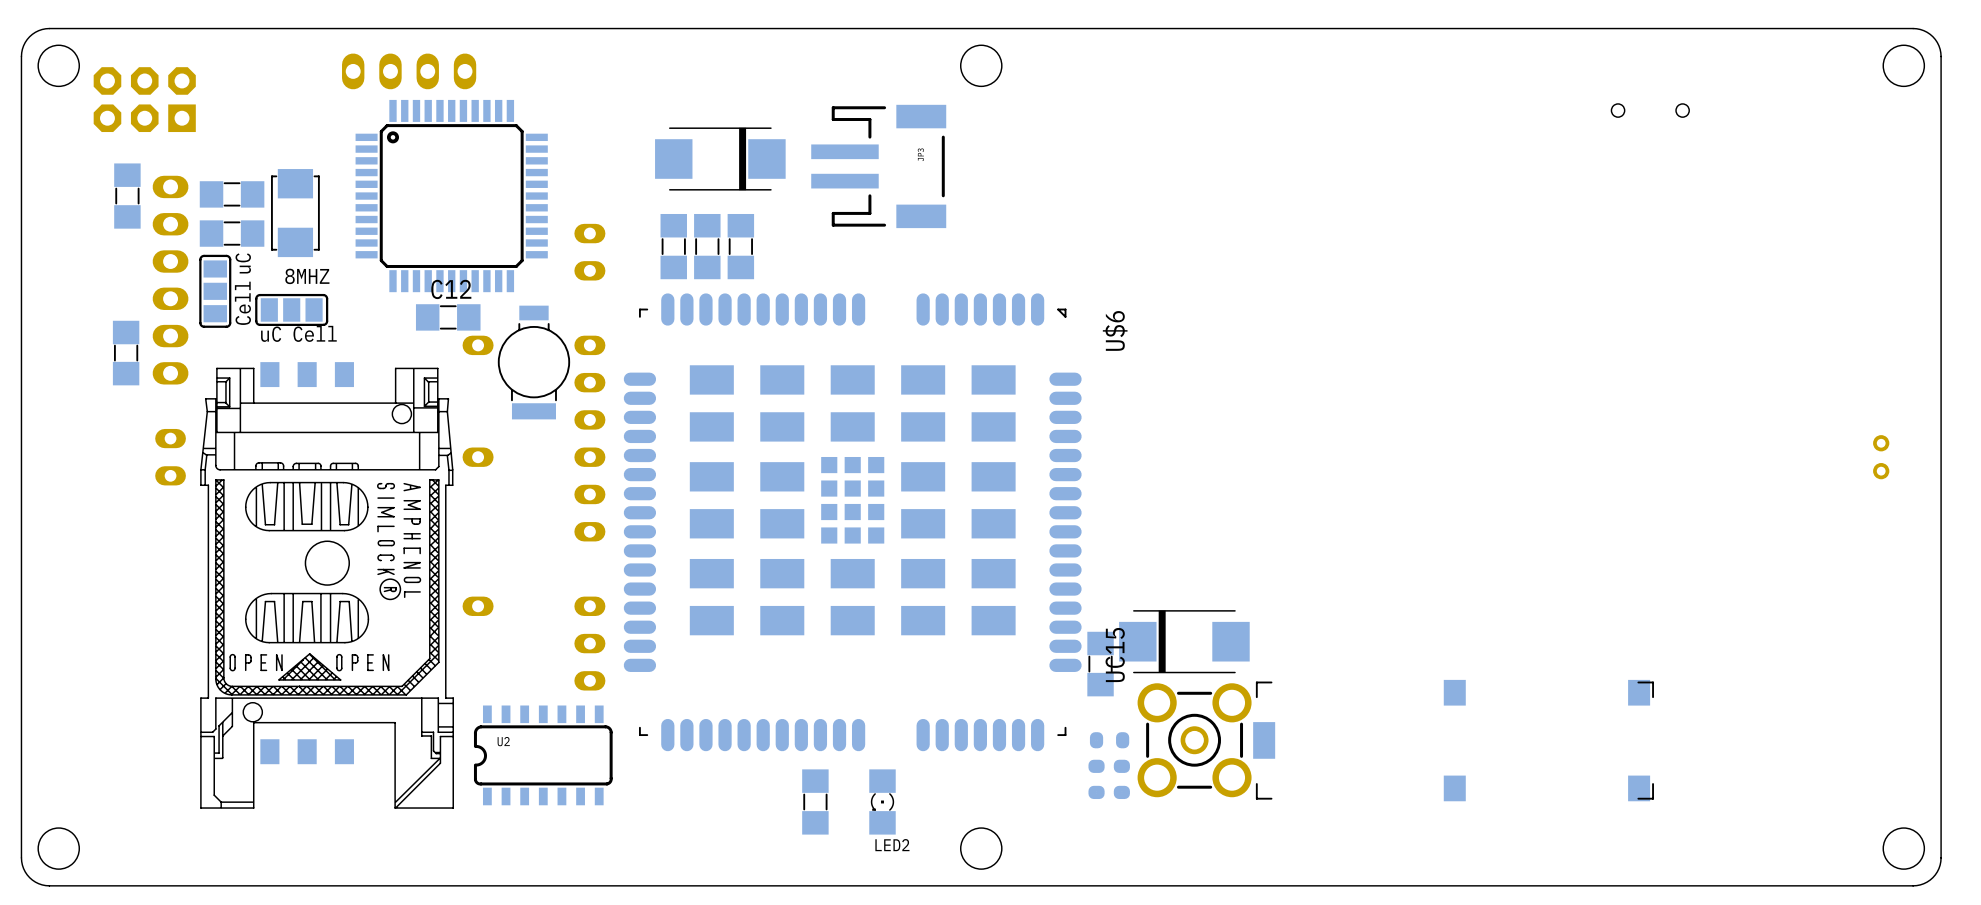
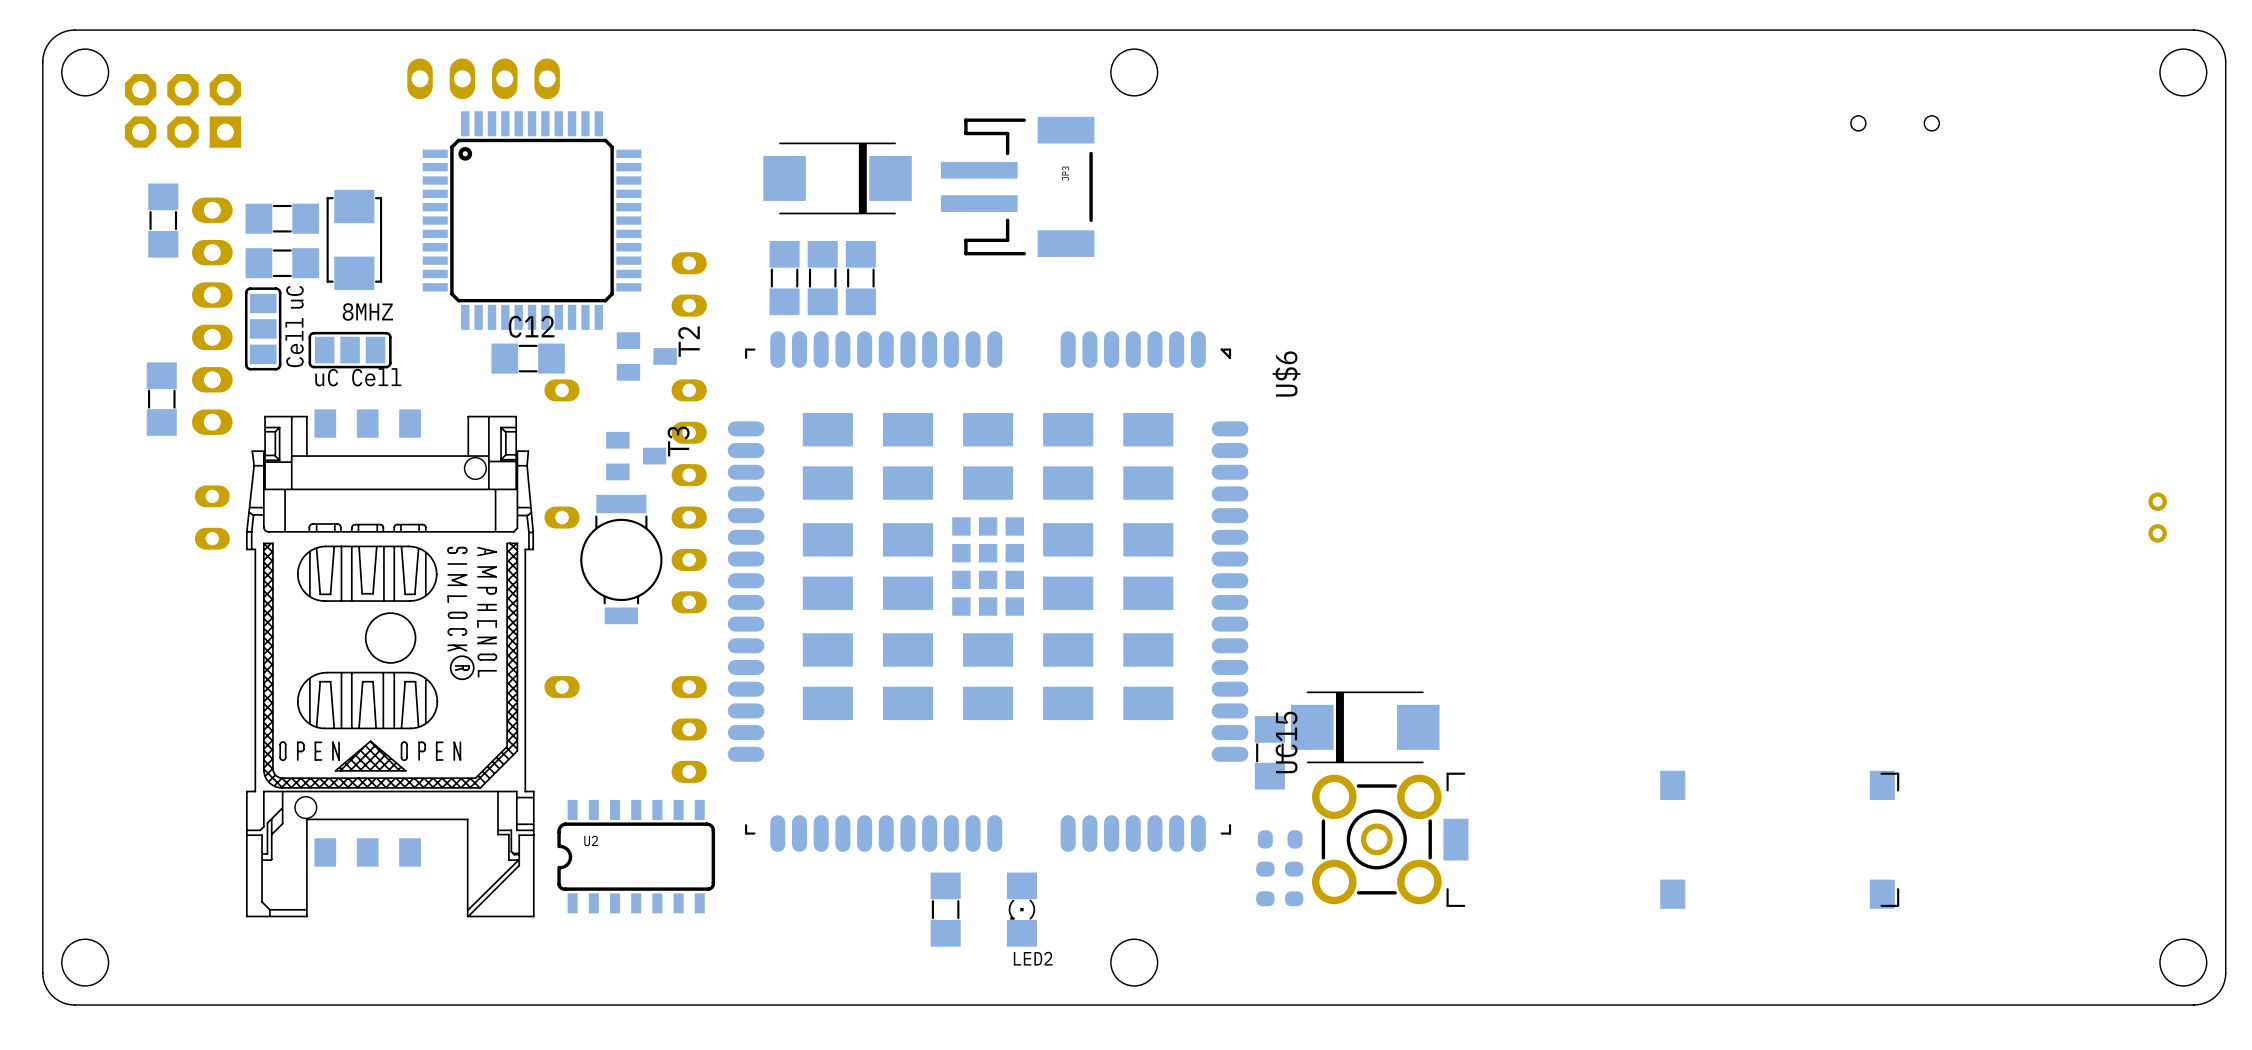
T2: none -> (646, 356)
part rotation: 0° (533, 362) -> 180° (621, 559)
part position: (533, 362) -> (621, 559)
T3: none -> (636, 456)

